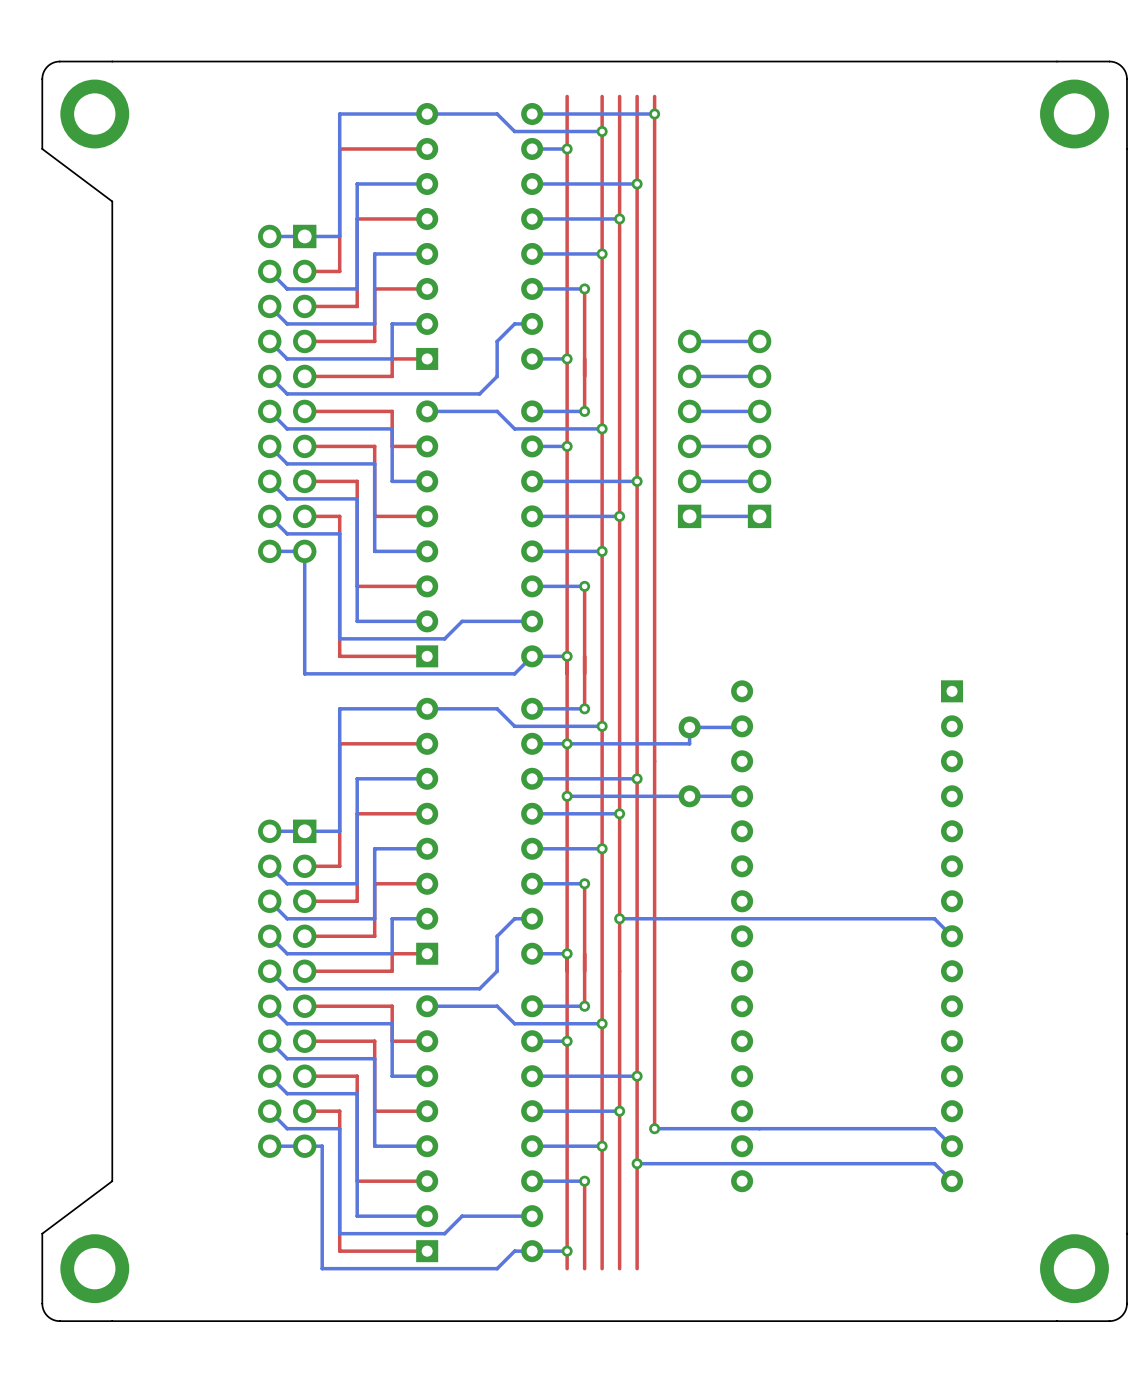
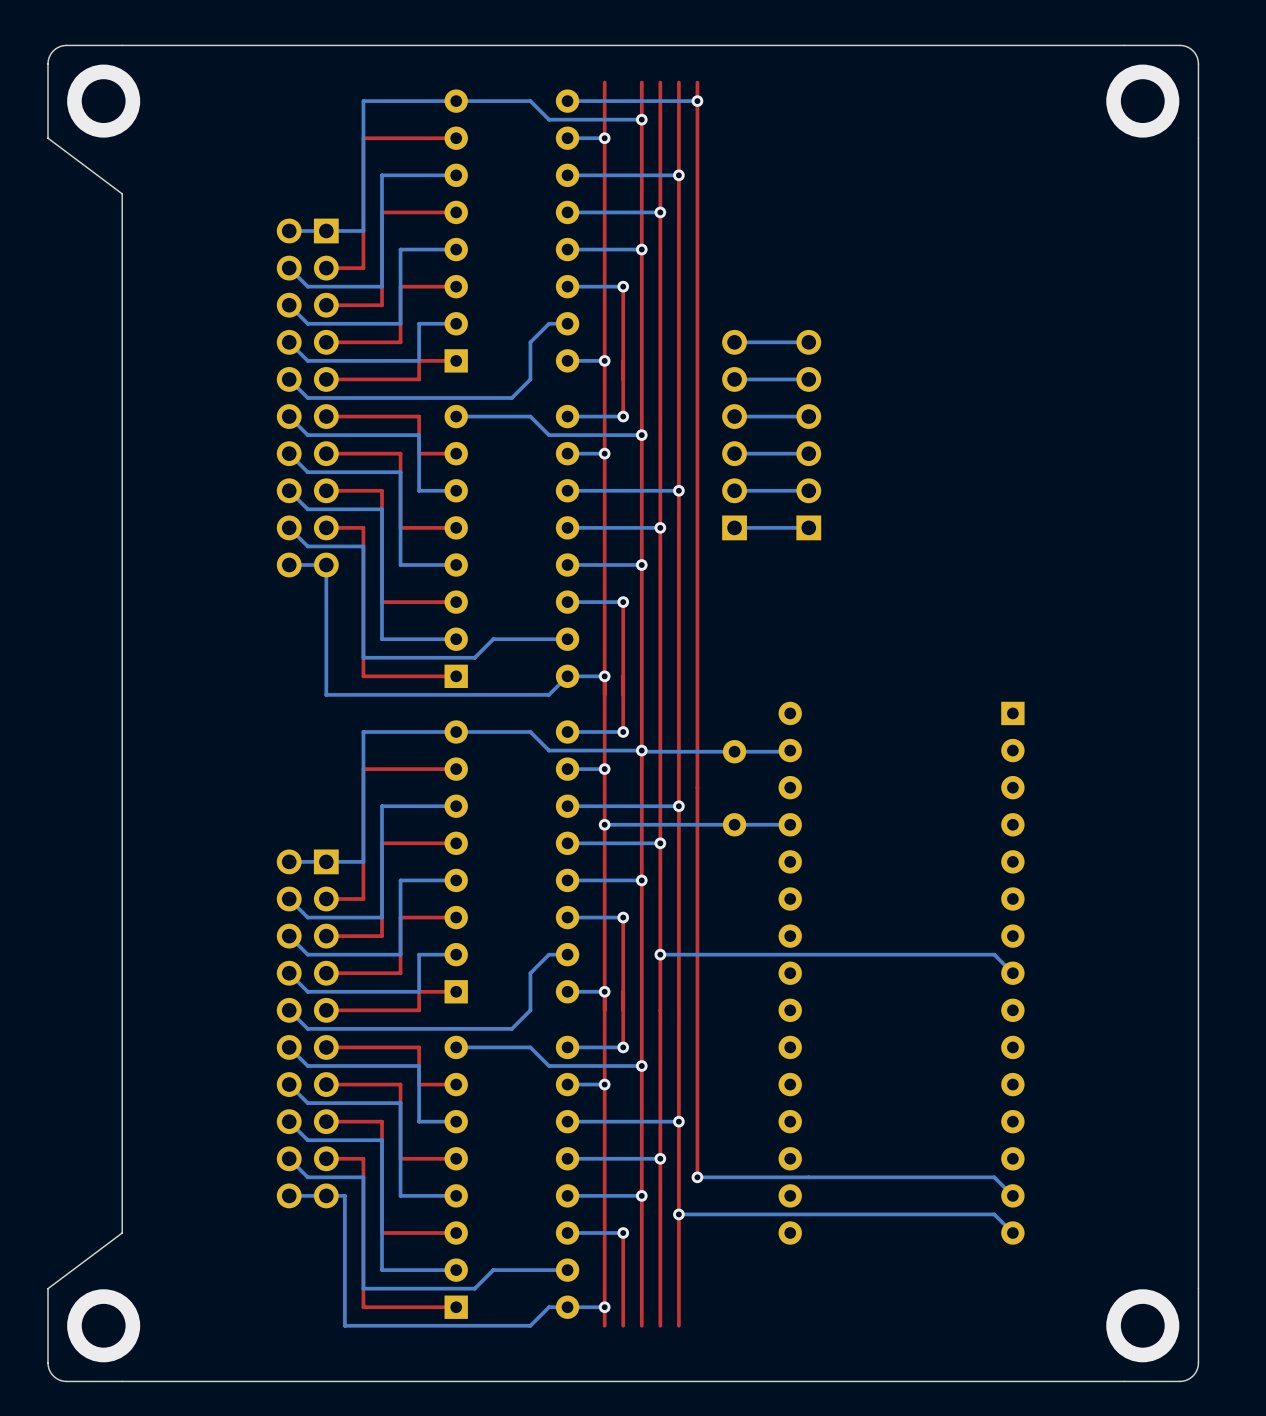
bottom track: none -> (641, 750) (734, 751)
bottom track: (689, 726) (689, 743) (567, 743) -> none

